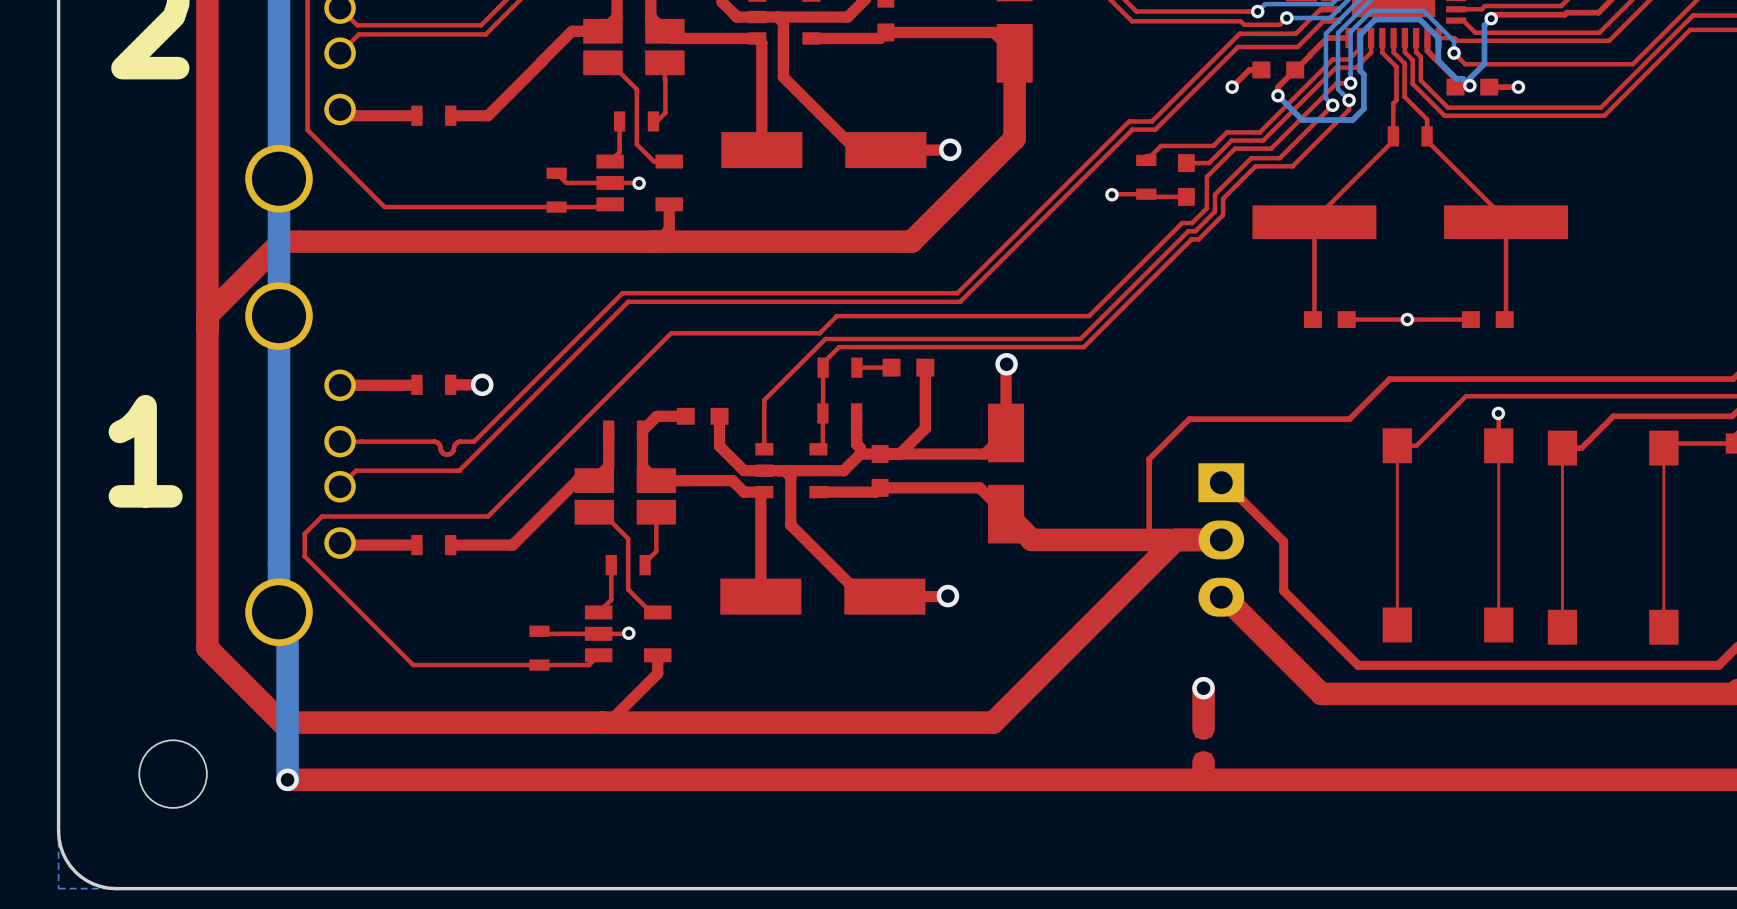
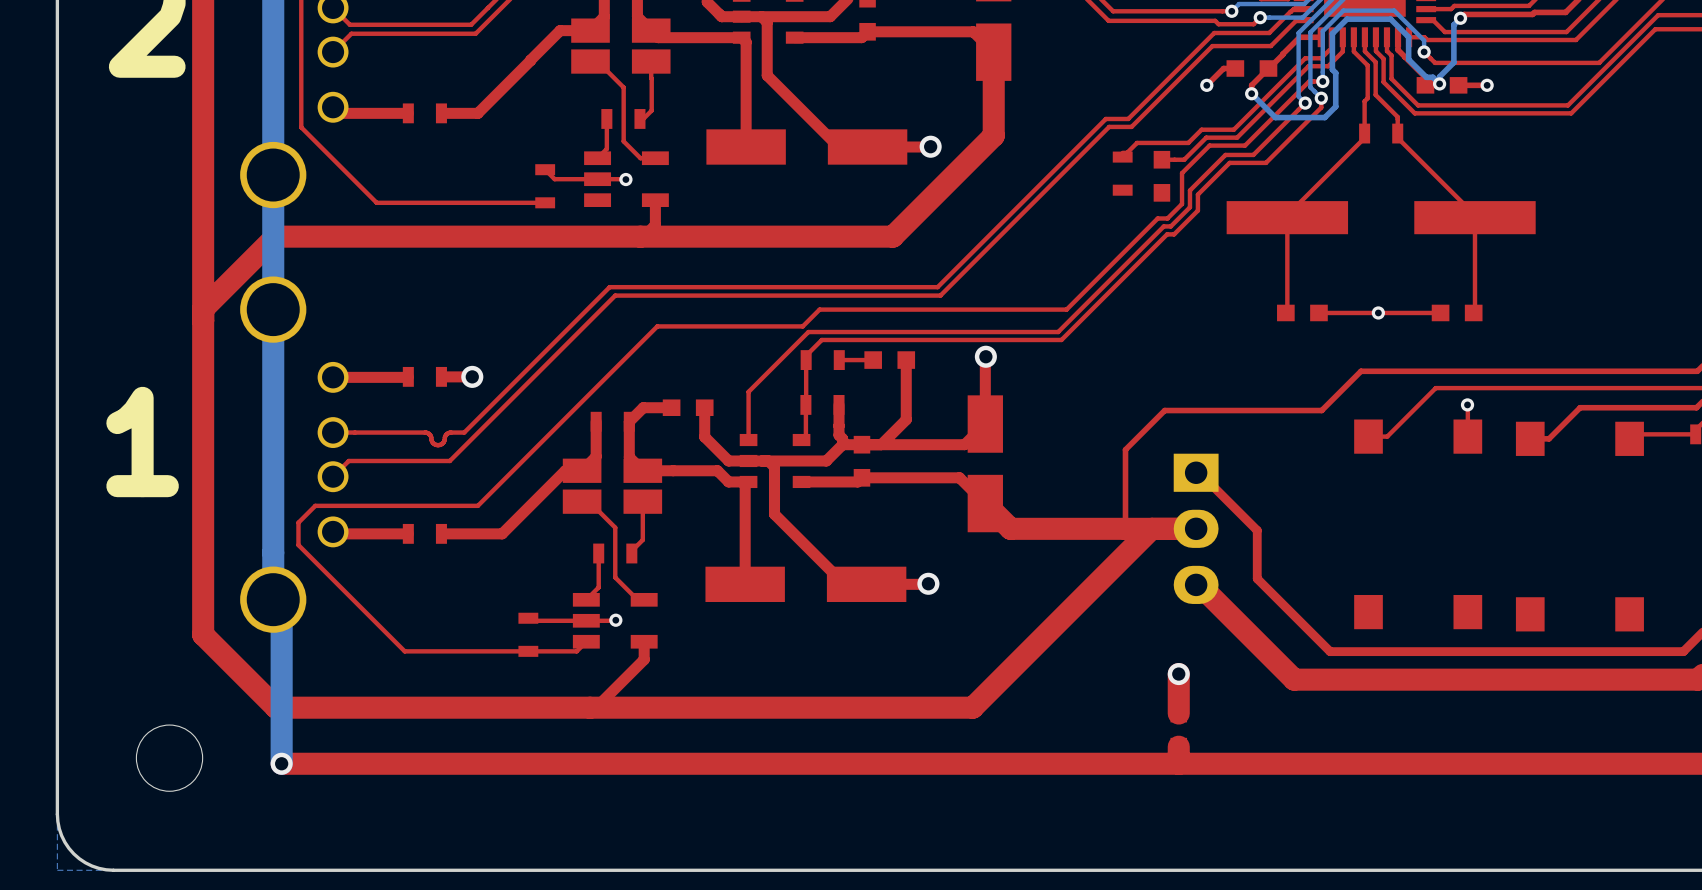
top track: (1111, 194) (1146, 194) (1149, 196) (1186, 196) -> none
via: (1111, 194) -> none
top track: (610, 204) (607, 207) (556, 207) -> none
top track: (1397, 445) (1397, 624) -> none
top track: (1498, 445) (1498, 624) -> none
top track: (1562, 448) (1562, 627) -> none
top track: (1663, 448) (1663, 627) -> none

